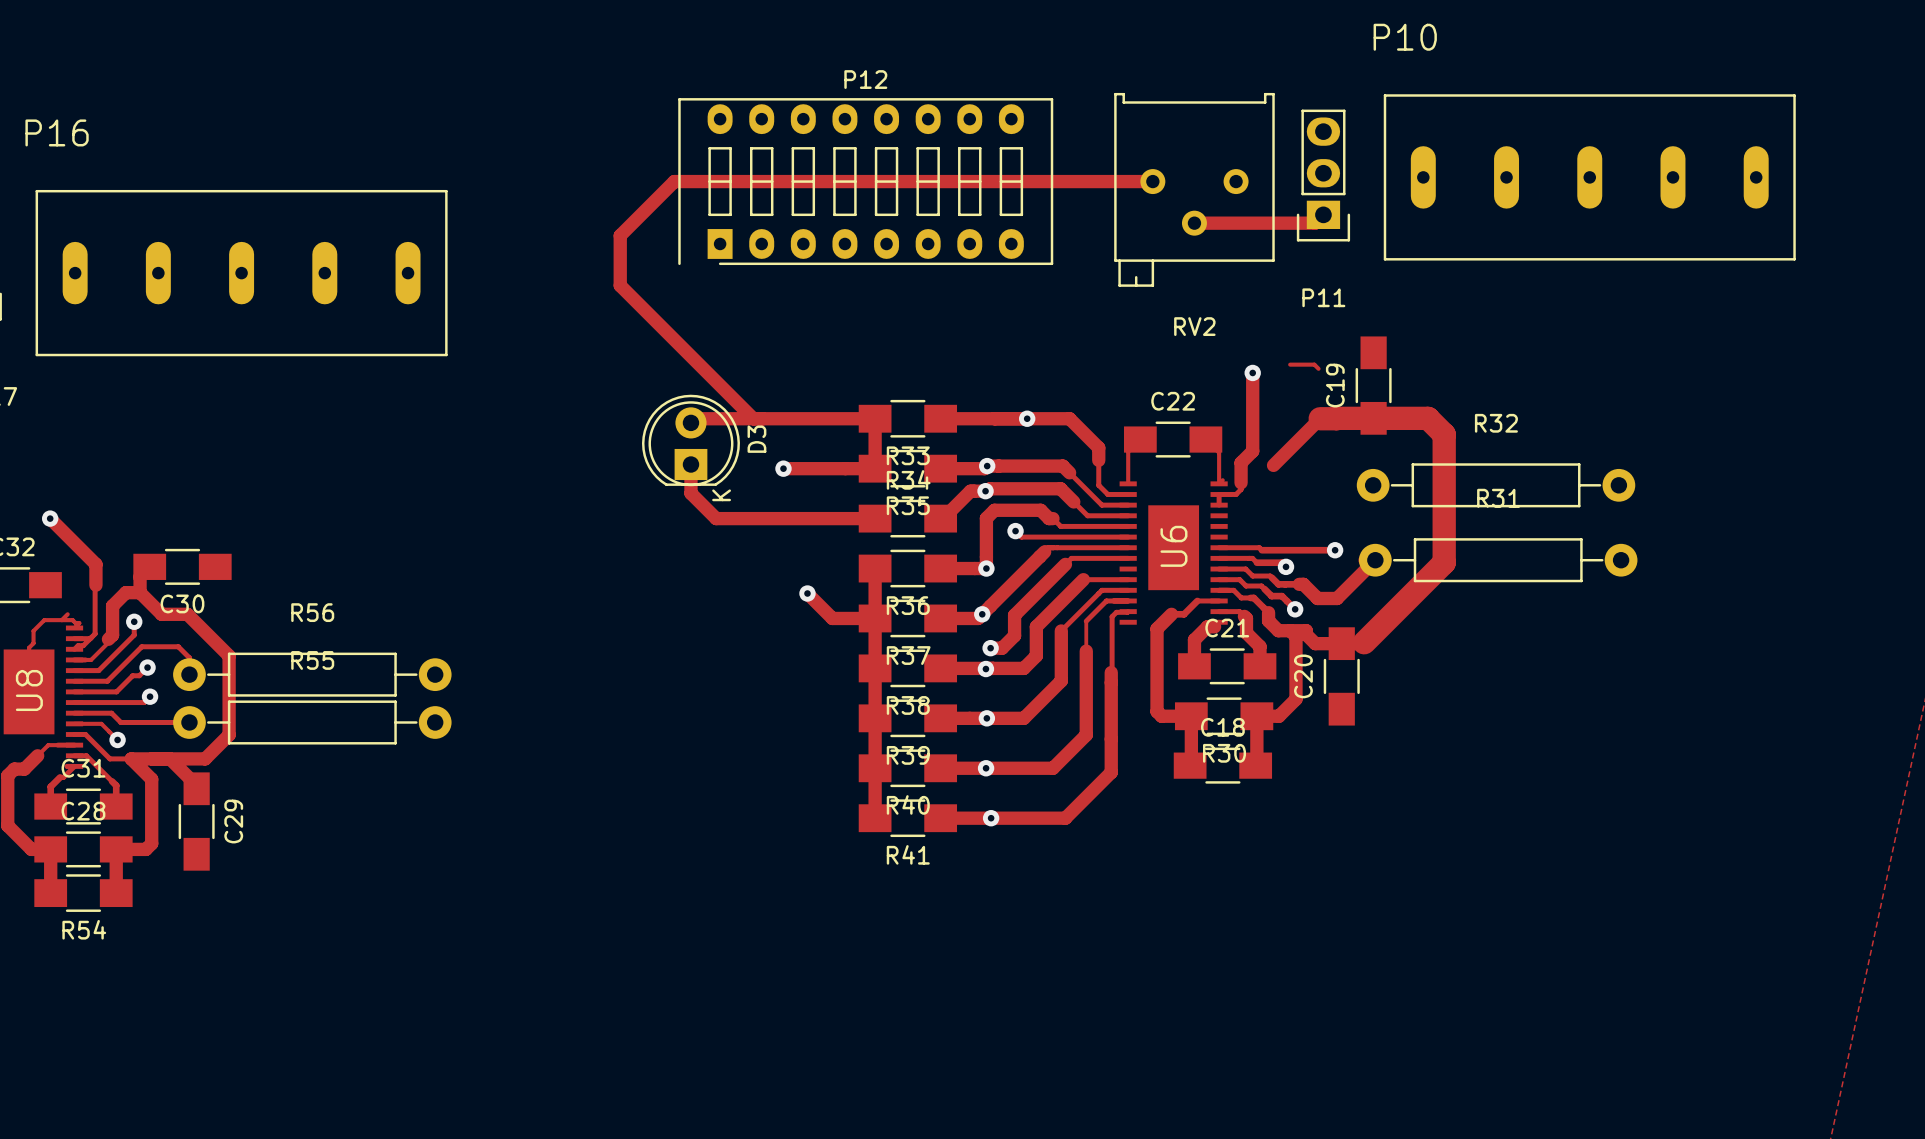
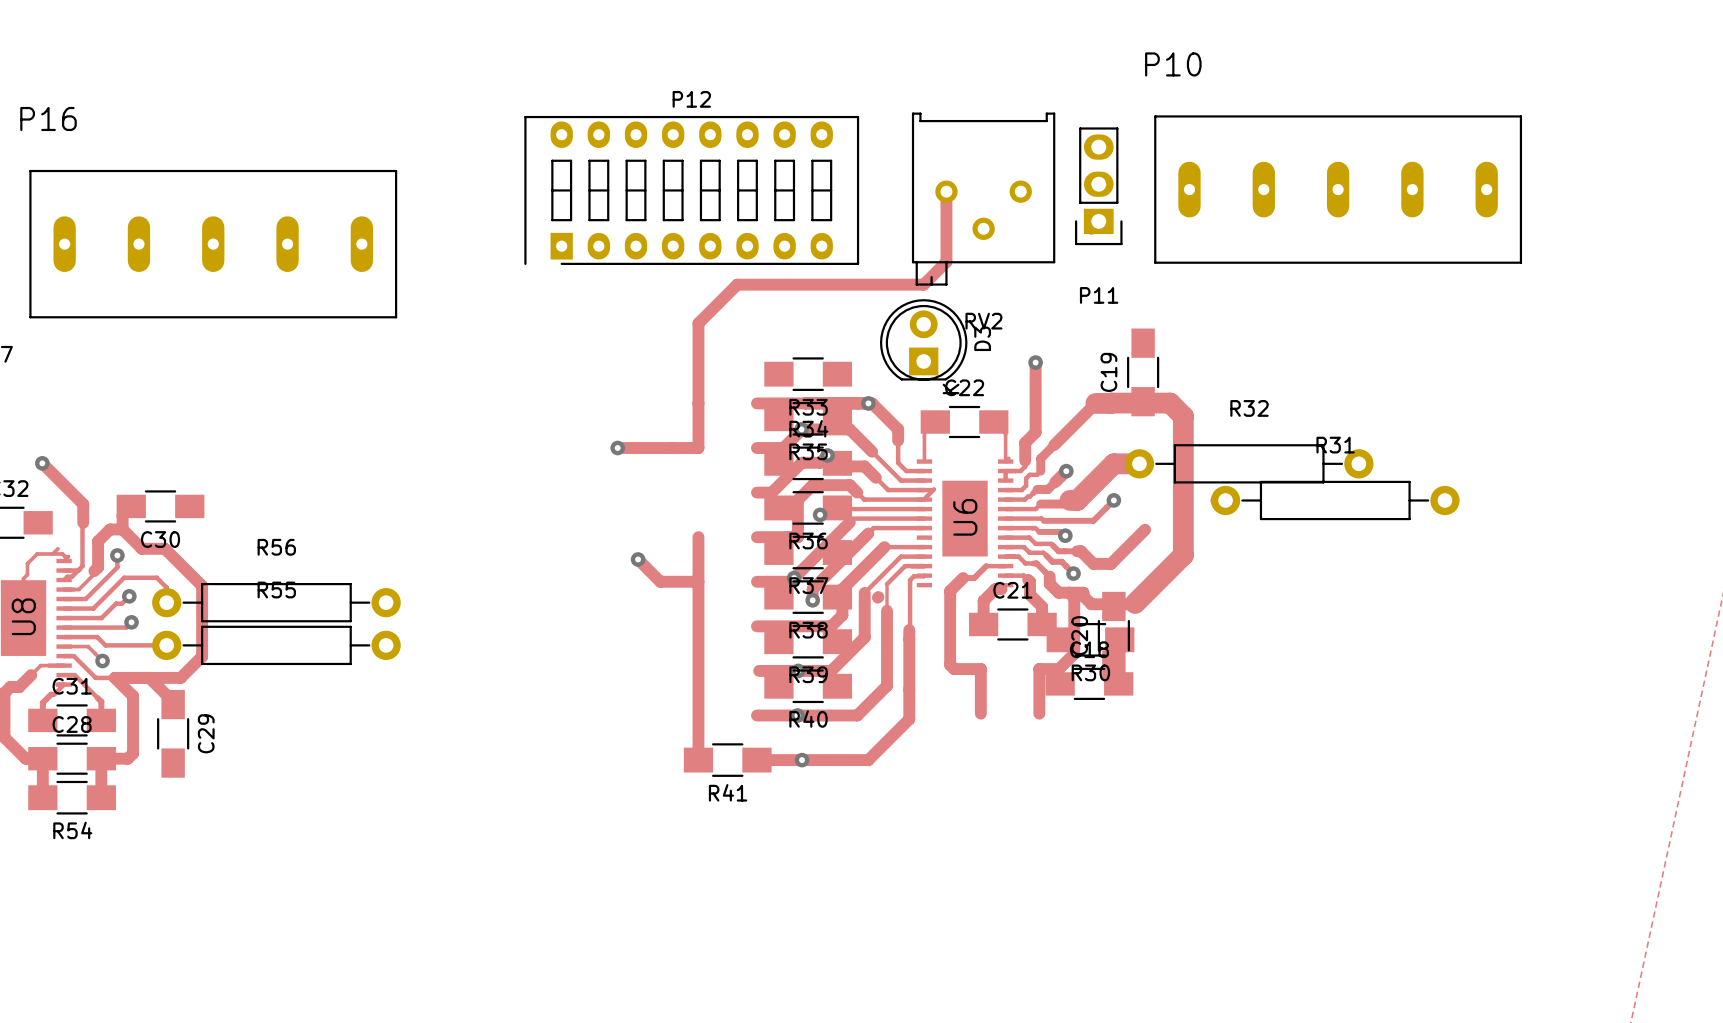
P11 position: (1323, 175) -> (1098, 186)
P10 position: (1589, 177) -> (1338, 189)
P12 position: (865, 181) -> (691, 190)
track: (1152, 181) (674, 181) (620, 235) (620, 285) (753, 418) -> none
RV2 position: (1194, 189) -> (983, 199)
track: none -> (946, 191) (946, 261) (923, 284) (737, 284) (698, 323) (698, 448) (617, 448)
track: (1323, 214) (1315, 223) (1194, 223) -> none
track: (1290, 364) (1314, 364) (1318, 368) -> none
track: (1252, 372) (1252, 451) (1241, 462) (1241, 489) (1236, 494) (1219, 494) (1219, 505) -> (1035, 362) (1035, 432) (1025, 442) (1025, 466) (1020, 471) (1005, 471) (1005, 480)
via: (1252, 372) -> none
C19 position: (1373, 385) -> (1143, 372)
via: none -> (1035, 362)
track: (940, 418) (1069, 418) (1098, 447) (1098, 485) (1107, 494) (1128, 494) -> (756, 403) (872, 403) (898, 429) (898, 462) (906, 471) (924, 471)
via: (1027, 418) -> none
track: (1320, 418) (1273, 465) -> none
track: (1320, 418) (1428, 418) (1444, 434) (1444, 562) (1363, 643) (1315, 643) (1306, 634) (1306, 630) (1278, 630) (1268, 620) (1268, 612) (1253, 597) (1241, 597) (1233, 590) (1219, 590) -> none
track: (690, 422) (695, 418) (875, 418) (875, 468) (783, 468) -> none
track: (1140, 439) (1128, 451) (1128, 483) -> (935, 422) (924, 432) (924, 461)
C22 position: (1173, 439) -> (964, 422)
track: (1205, 439) (1219, 452) (1219, 483) (1222, 480) -> (993, 422) (1005, 433) (1005, 461) (1008, 458)
D3 position: (690, 440) -> (923, 339)
track: none -> (1095, 403) (1040, 458) (1040, 471) (1037, 474) (1029, 474) (1026, 478) (1026, 485) (1021, 490) (1005, 490)
track: none -> (1095, 403) (1170, 403) (1183, 416) (1183, 555) (1134, 604) (1091, 604) (1083, 596) (1083, 592) (1058, 592) (1049, 583) (1049, 576) (1036, 563) (1025, 563) (1018, 556) (1005, 556)
track: (690, 464) (690, 493) (716, 518) (875, 518) -> none
via position: (987, 466) -> (868, 403)
via: (783, 468) -> none
track: (940, 468) (984, 468) (987, 466) (1062, 466) (1101, 505) (1128, 505) -> none
via: none -> (801, 429)
R32 position: (1496, 485) -> (1249, 463)
via: (985, 491) -> none
via: none -> (617, 448)
track: none -> (756, 448) (783, 448) (801, 429) (849, 429) (900, 480) (924, 480)
via: none -> (827, 455)
track: (943, 515) (940, 518) (943, 518) (970, 491) (987, 491) (990, 488) (1060, 488) (1087, 515) (1128, 515) -> none
track: none -> (1139, 463) (1113, 463) (1077, 500) (1069, 500) (1066, 504) (1040, 504) (1035, 509) (1005, 509)
track: (1128, 526) (1060, 526) (1040, 510) (994, 510) (986, 518) (986, 568) (940, 568) -> none
track: none -> (1066, 471) (1048, 489) (1037, 489) (1024, 499) (1005, 499)
via: none -> (1066, 471)
track: (1015, 531) (1021, 537) (1128, 537) -> none
via: (1015, 531) -> none
track: (1044, 547) (1128, 547) -> (849, 518) (924, 518)
track: (1219, 547) (1259, 547) (1261, 550) (1335, 550) -> none
track: none -> (759, 490) (756, 492) (771, 492) (801, 462) (820, 462) (827, 455) (838, 466) (864, 466) (888, 490) (924, 490)
via: (1335, 550) -> none
track: (1044, 551) (978, 618) (940, 618) -> (849, 522) (790, 581) (756, 581)
U6 position: (1173, 553) -> (965, 523)
track: (1128, 558) (1071, 558) (1014, 615) (1014, 635) (1002, 648) (990, 648) -> none
track: (1219, 558) (1252, 558) (1256, 562) (1281, 562) (1286, 566) -> (1005, 528) (1035, 528) (1039, 531) (1061, 531) (1065, 535)
track: none -> (924, 499) (864, 499) (849, 485) (812, 485) (797, 500) (797, 537) (756, 537)
track: none -> (1113, 500) (1093, 520) (1005, 518)
via: none -> (1113, 500)
via: (1286, 566) -> none
via: (986, 568) -> none
track: none -> (924, 509) (825, 509) (820, 514)
track: (1219, 569) (1245, 569) (1252, 576) (1270, 576) (1278, 584) (1303, 584) (1317, 598) (1337, 598) (1375, 560) (1366, 569) -> (1005, 537) (1029, 537) (1035, 543) (1051, 543) (1058, 551) (1080, 551) (1093, 563) (1110, 563) (1145, 529) (1137, 537)
via: none -> (820, 514)
track: (1128, 579) (1083, 579) (1036, 626) (1036, 655) (1023, 668) (940, 668) -> (924, 547) (884, 547) (842, 589) (842, 615) (831, 626) (756, 626)
track: (1219, 579) (1239, 579) (1246, 586) (1261, 586) (1271, 596) (1281, 596) (1295, 609) -> (1005, 547) (1024, 547) (1029, 552) (1043, 552) (1052, 561) (1061, 561) (1073, 573)
track: (1128, 590) (1101, 590) (1061, 630) (1061, 680) (1023, 718) (940, 718) -> (924, 556) (900, 556) (864, 592) (864, 637) (831, 670) (756, 670)
track: none -> (924, 528) (873, 528) (812, 589) (812, 600)
track: (807, 593) (832, 618) (875, 618) -> (638, 559) (660, 581) (698, 581)
via: (807, 593) -> none
via: none -> (1065, 535)
track: (1128, 600) (1106, 600) (1086, 621) (1086, 651) -> (924, 566) (905, 566) (887, 584) (887, 610)
track: (1219, 600) (1197, 600) (1184, 614) (1171, 614) (1157, 628) (1157, 711) (1161, 716) (1191, 716) (1191, 766) -> (1005, 566) (986, 566) (974, 578) (963, 578) (950, 591) (950, 664) (954, 669) (980, 669) (980, 713)
via: (1295, 609) -> none
track: (1128, 611) (1116, 612) (1112, 616) (1111, 682) -> (924, 575) (913, 576) (910, 580) (909, 639)
track: (1219, 611) (1239, 611) (1246, 618) (1246, 633) (1259, 646) (1259, 666) -> (1005, 575) (1023, 575) (1030, 581) (1030, 594) (1042, 606) (1042, 624)
via: (982, 614) -> none
track: (1219, 622) (1214, 626) (1207, 626) (1194, 639) (1194, 666) -> (1005, 585) (1001, 589) (995, 589) (983, 600) (983, 624)
via: none -> (638, 559)
track: (1290, 630) (1295, 636) (1295, 699) (1278, 716) (1256, 716) (1256, 766) -> (1069, 592) (1074, 597) (1074, 653) (1059, 669) (1039, 669) (1039, 713)
via: none -> (1073, 573)
via: none -> (794, 578)
via: (990, 648) -> none
track: (1086, 651) (1086, 734) (1052, 768) (940, 768) -> (887, 610) (887, 685) (857, 715) (756, 715)
C21 position: (1227, 666) -> (1012, 624)
track: (875, 668) (875, 568) (875, 818) (875, 718) -> (698, 626) (698, 537) (698, 760) (698, 670)
via: (985, 669) -> none
via: none -> (812, 600)
track: (1111, 672) (1111, 772) (1065, 818) (940, 818) -> (909, 630) (909, 719) (868, 760) (756, 760)
C20 position: (1341, 676) -> (1113, 635)
via: (986, 718) -> none
via: none -> (798, 670)
via: (986, 768) -> none
via: none -> (797, 715)
R41 position: (907, 818) -> (727, 760)
via: (991, 818) -> none
via: none -> (802, 760)

